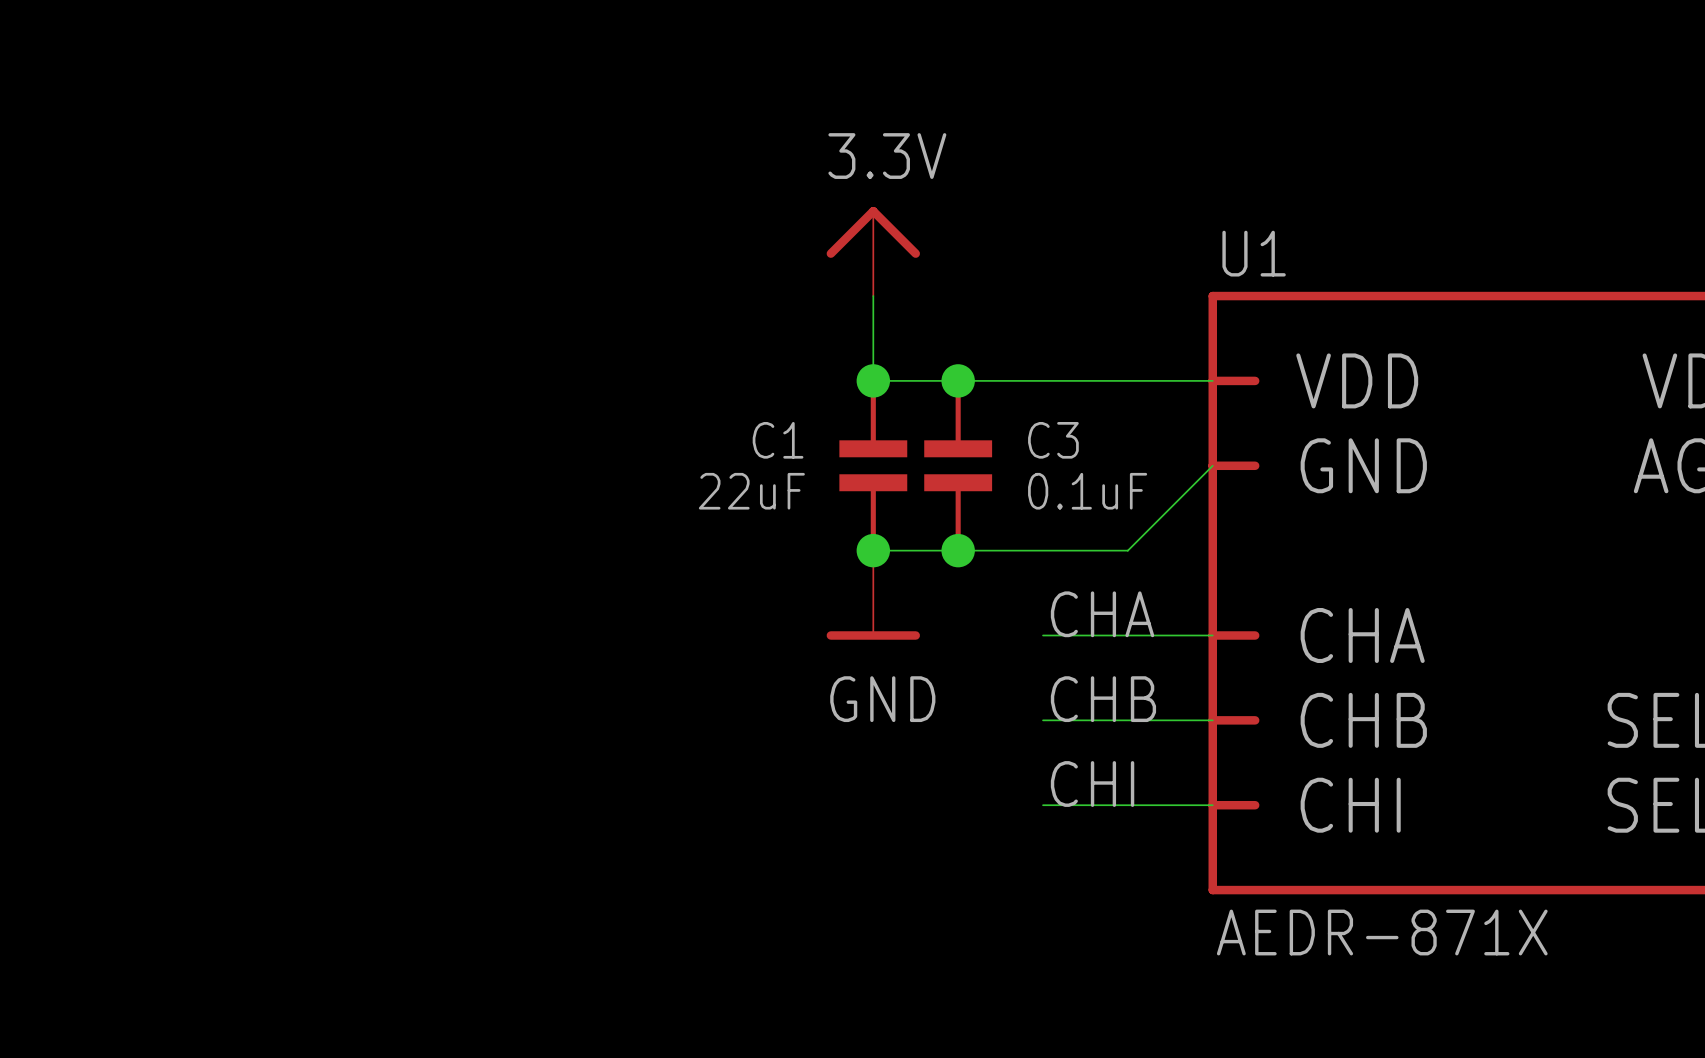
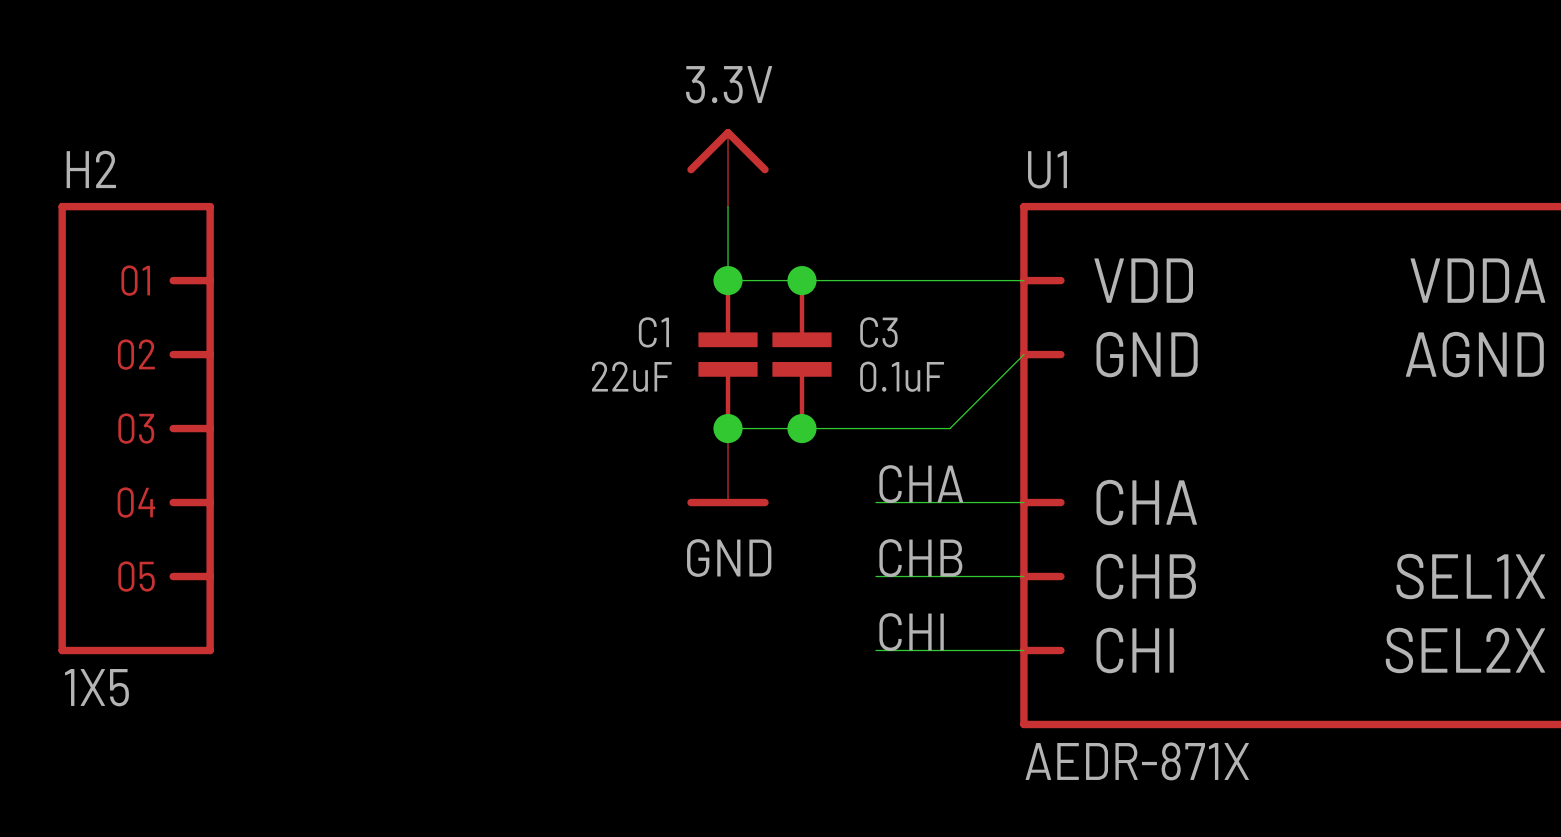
H2: none -> 1X5 (136, 428)

